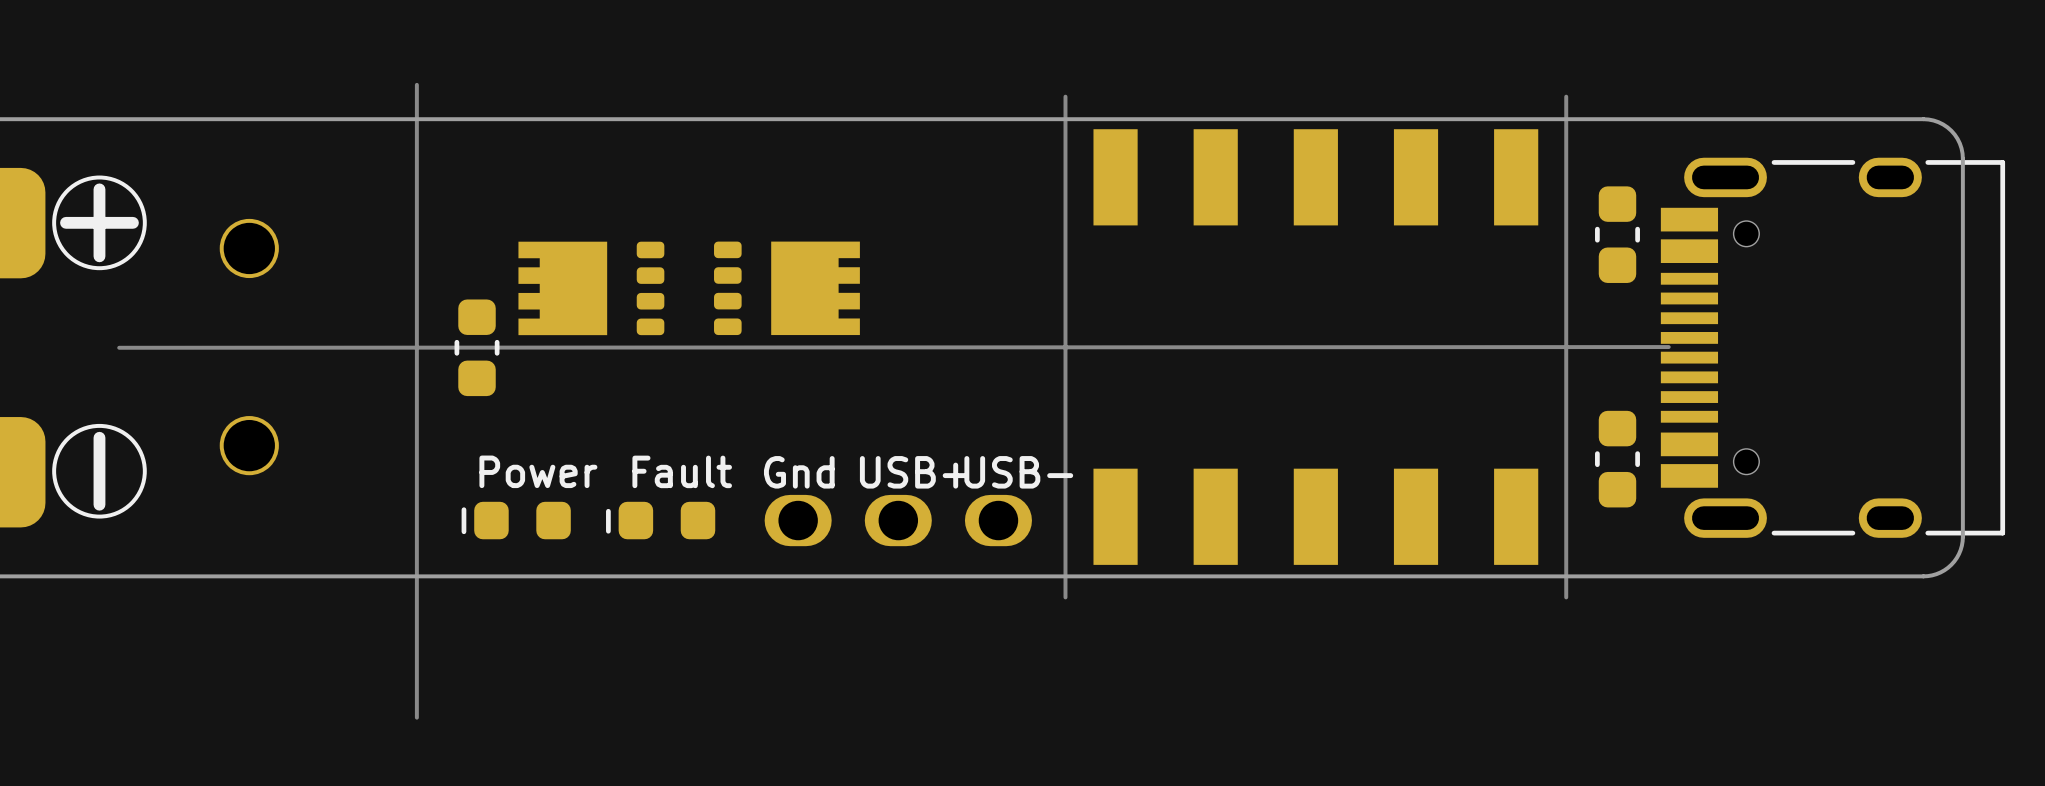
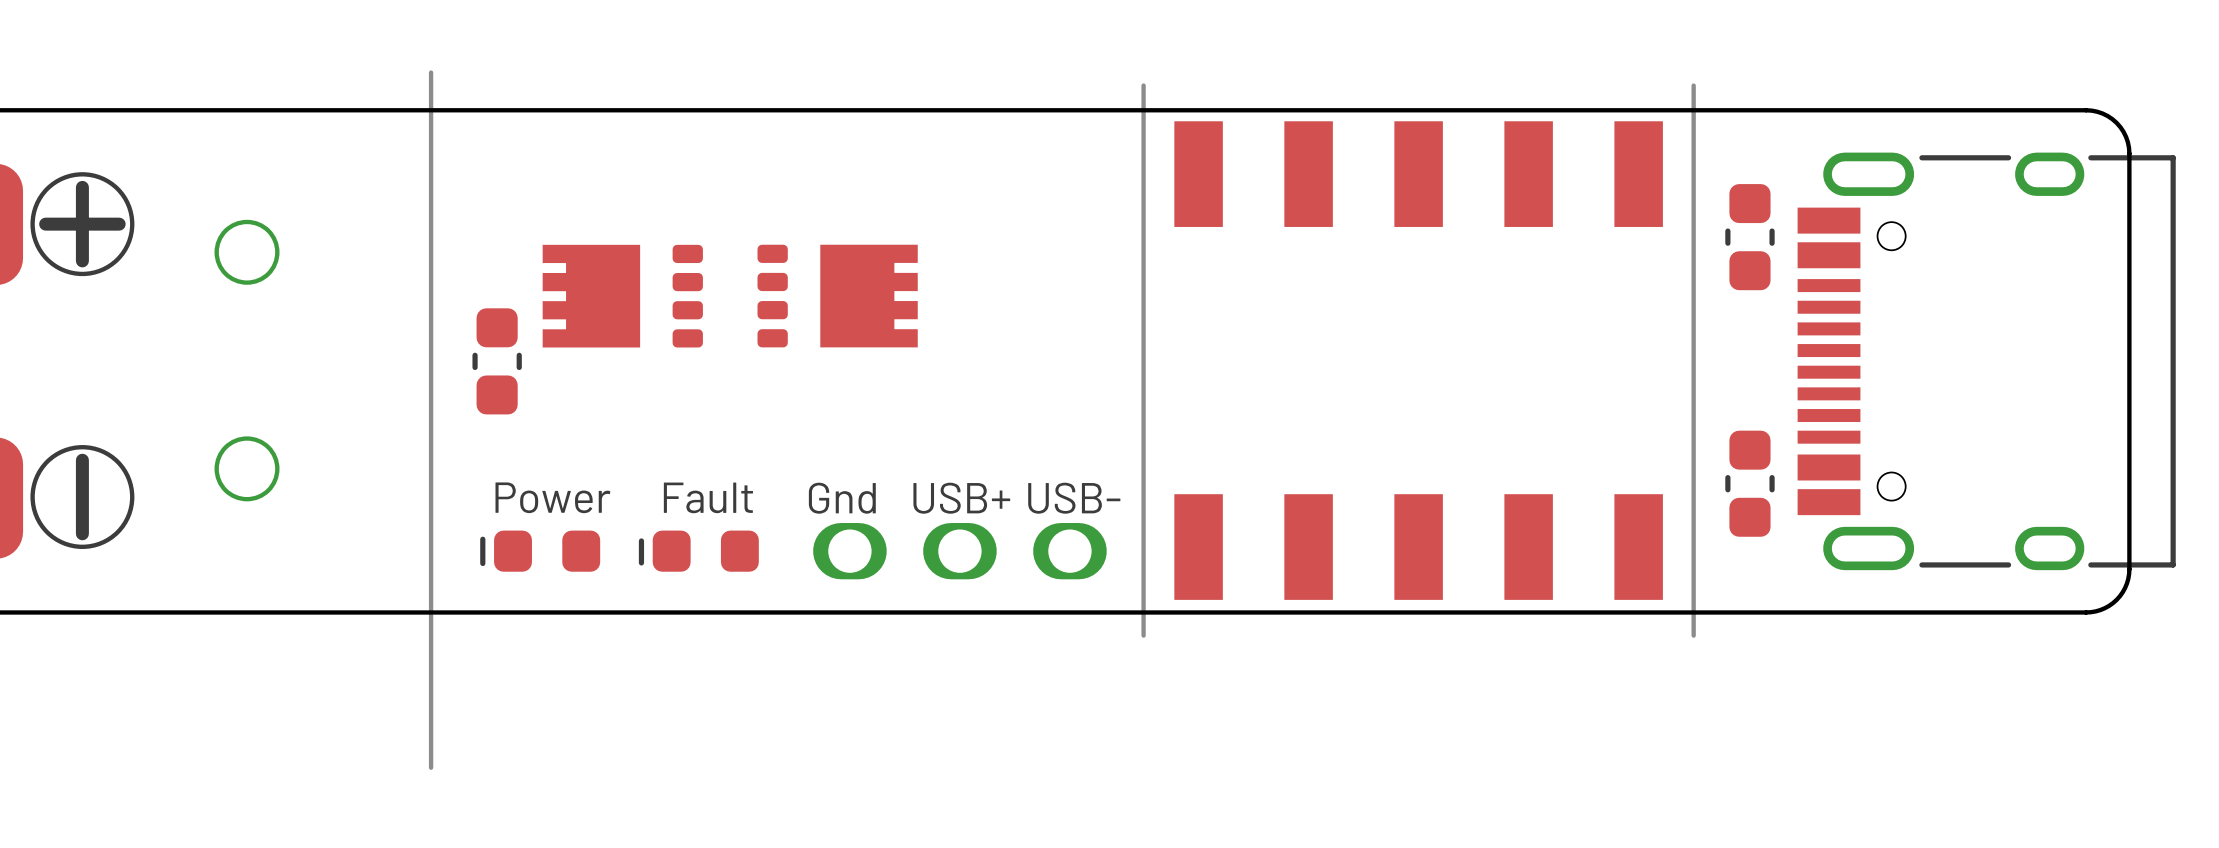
line: (1668, 347) (119, 347) -> none

